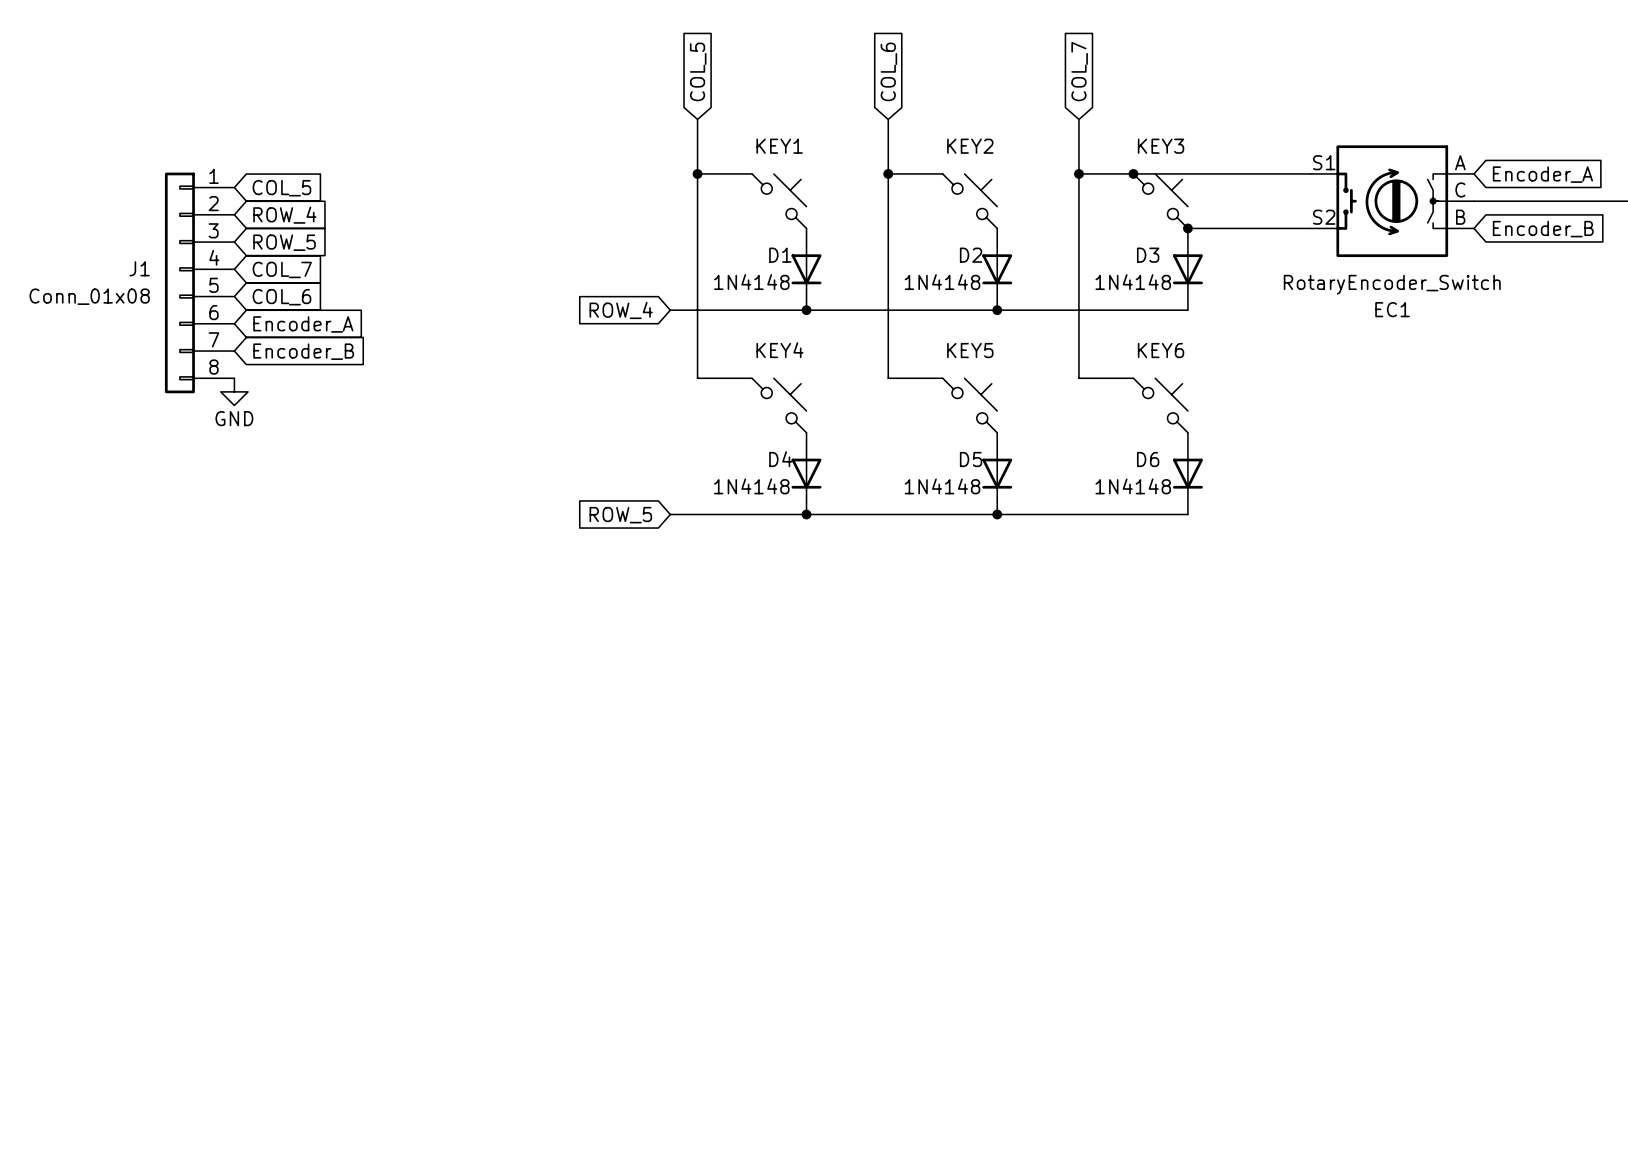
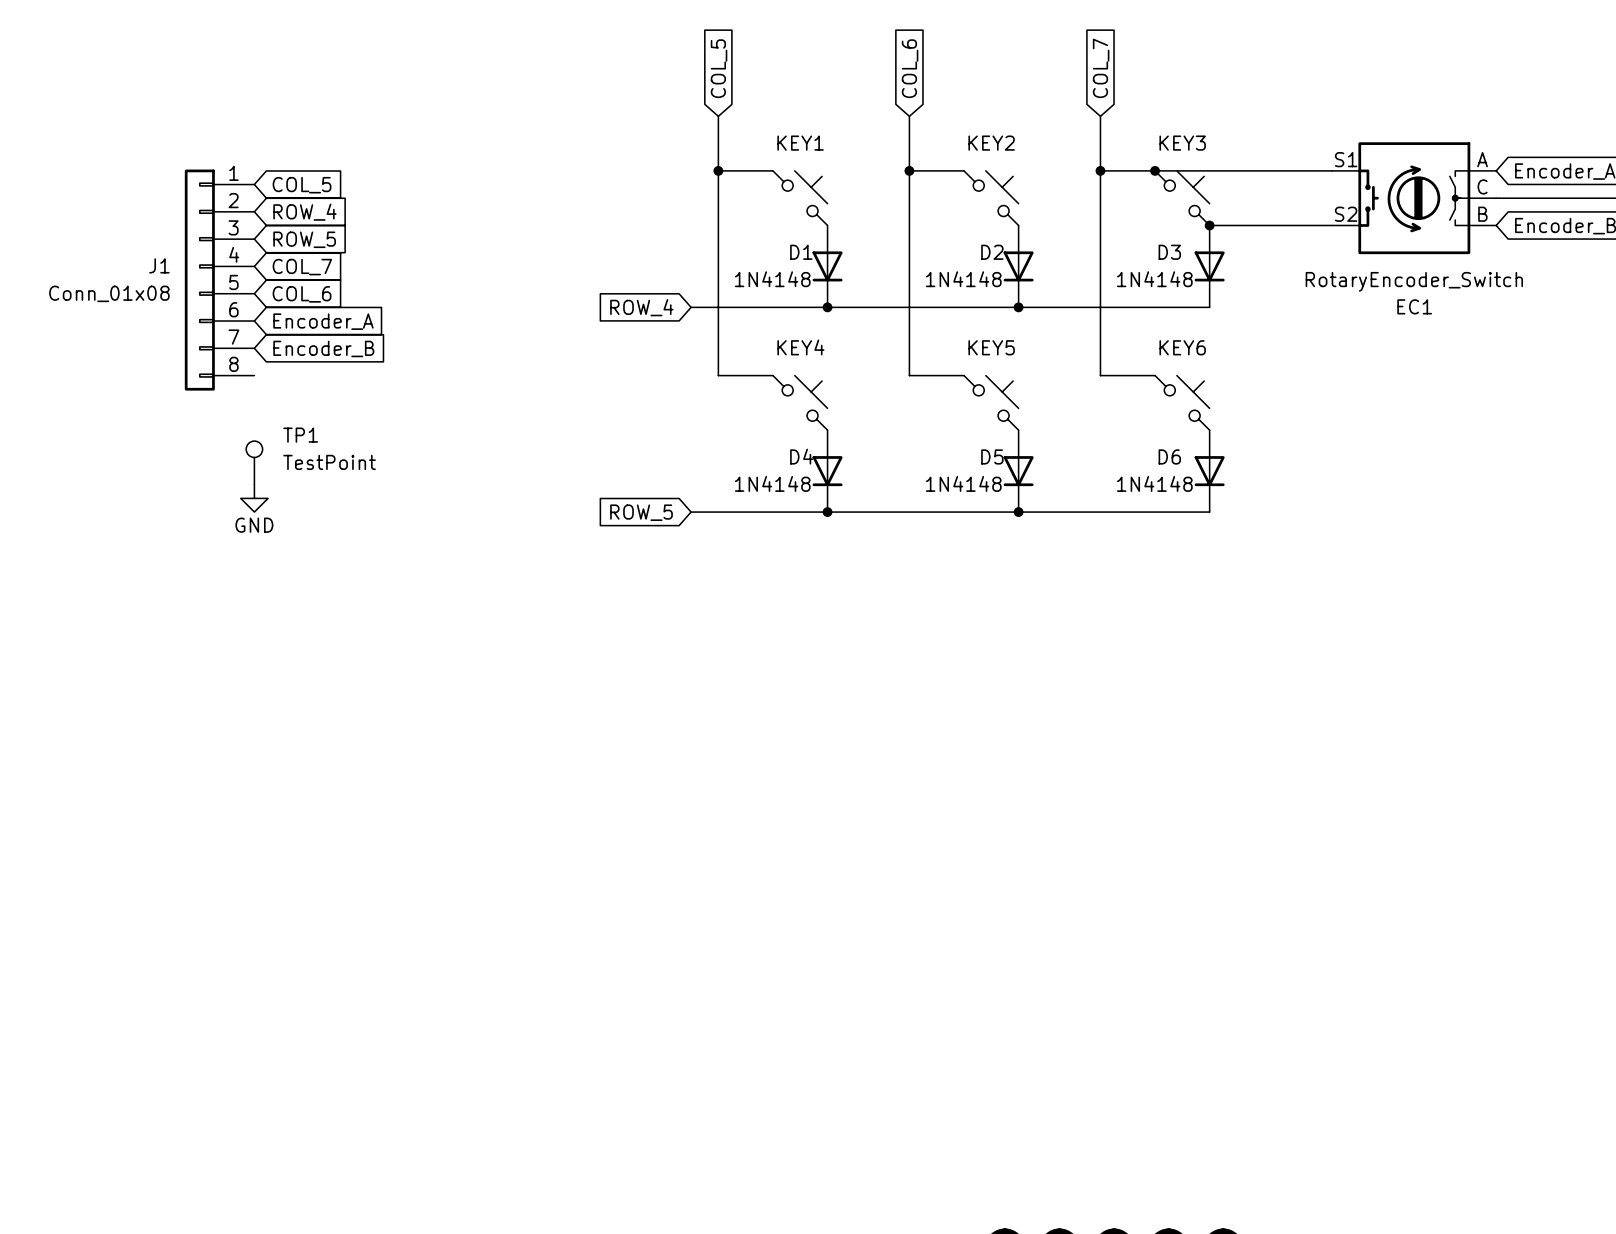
power symbol position: GND (234, 391) -> GND (254, 498)
TP1: none -> TestPoint (254, 462)

